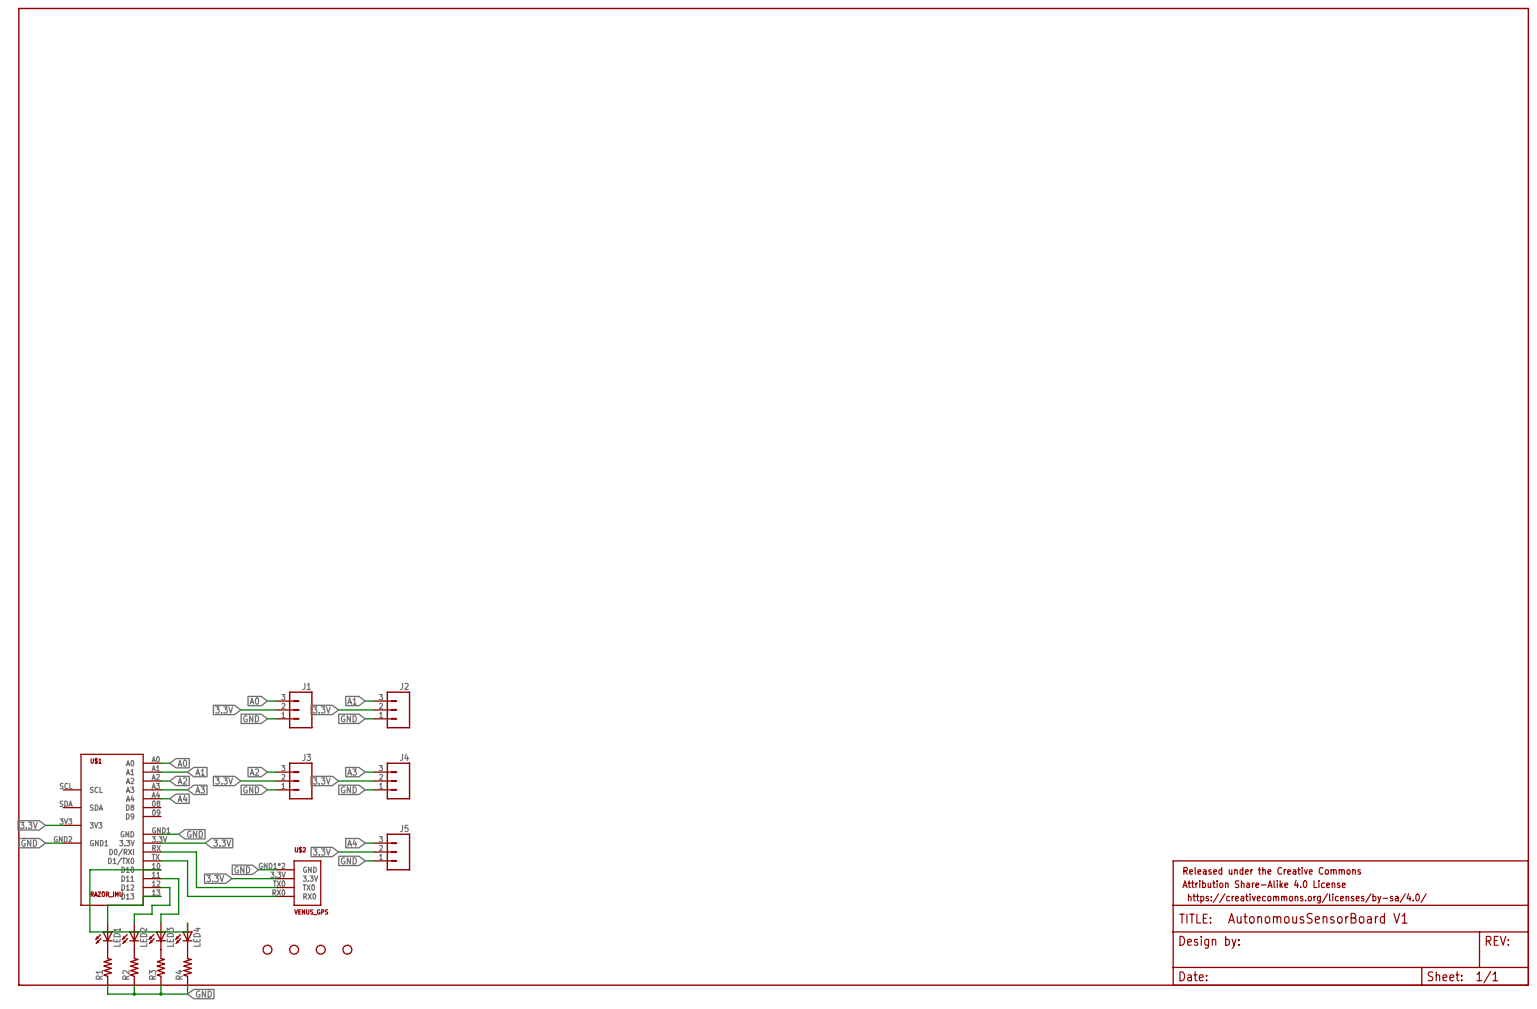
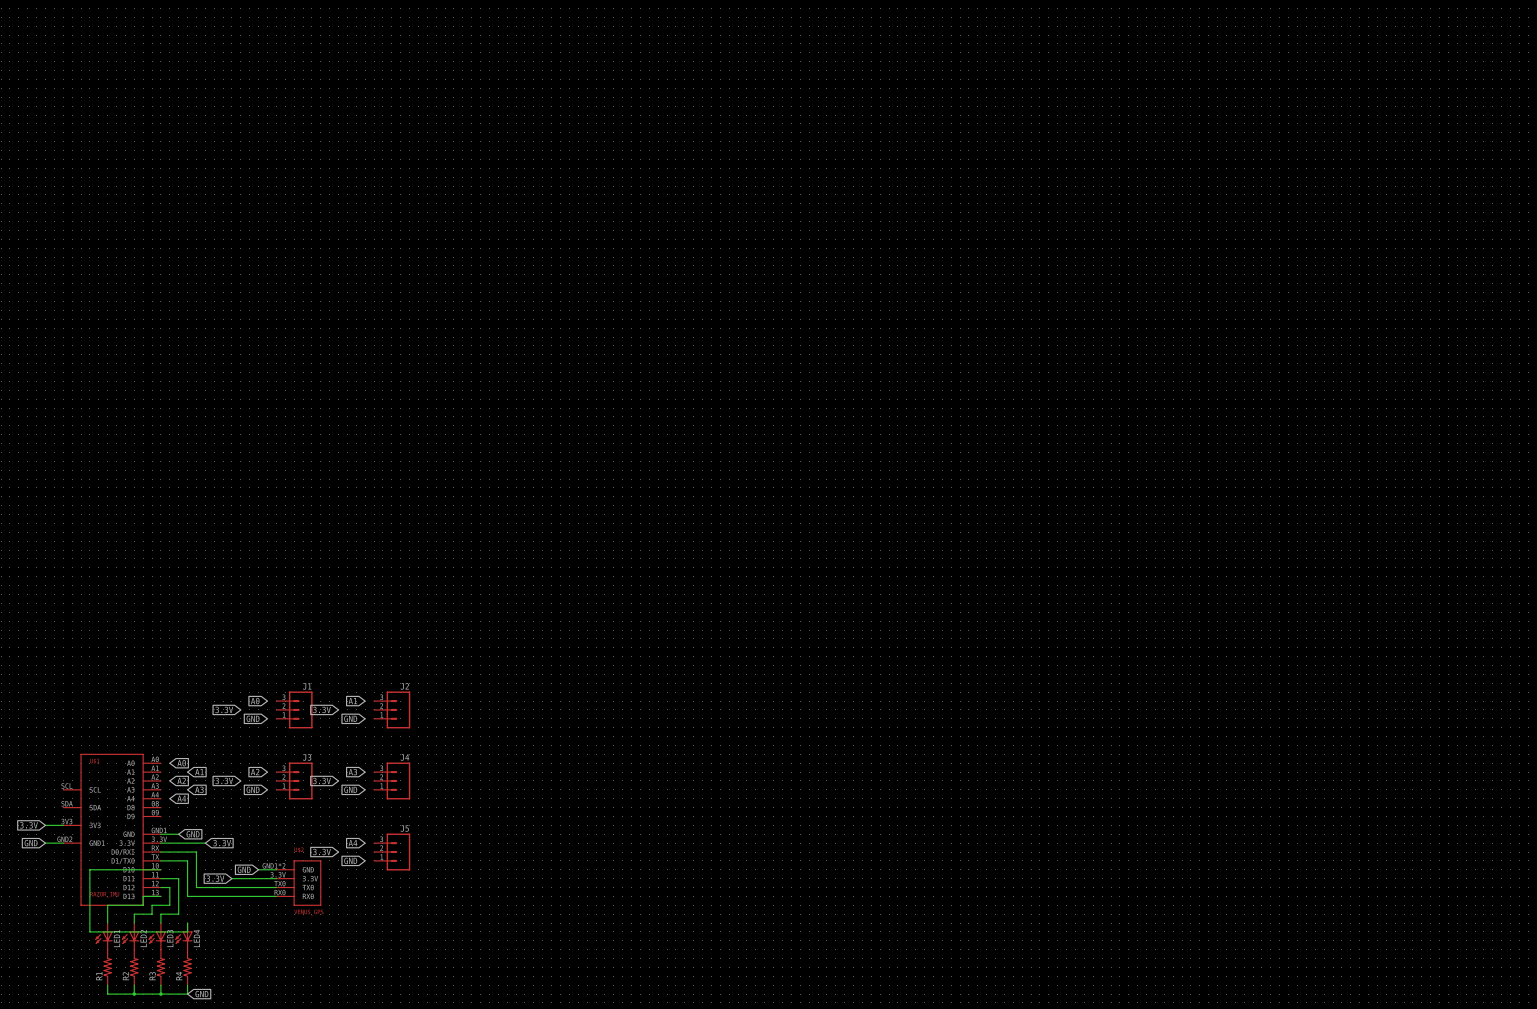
part: (773, 496) -> none
wire: (267, 701) (276, 701) -> none
wire: (365, 701) (374, 701) -> none
wire: (240, 709) (276, 709) -> none
wire: (338, 709) (374, 709) -> none
wire: (267, 718) (276, 718) -> none
wire: (365, 718) (374, 718) -> none
wire: (160, 763) (169, 763) -> none
wire: (160, 772) (187, 772) -> none
wire: (267, 772) (276, 772) -> none
wire: (365, 772) (374, 772) -> none
wire: (160, 780) (169, 780) -> none
wire: (240, 780) (276, 780) -> none
wire: (338, 780) (374, 780) -> none
wire: (160, 789) (187, 789) -> none
wire: (267, 789) (276, 789) -> none
wire: (365, 789) (374, 789) -> none
wire: (160, 798) (169, 798) -> none
wire: (365, 843) (374, 843) -> none
wire: (338, 852) (374, 852) -> none
wire: (365, 860) (374, 860) -> none
part: (1350, 923) -> none
part: (267, 949) -> none
part: (294, 949) -> none
part: (320, 949) -> none
part: (347, 949) -> none

